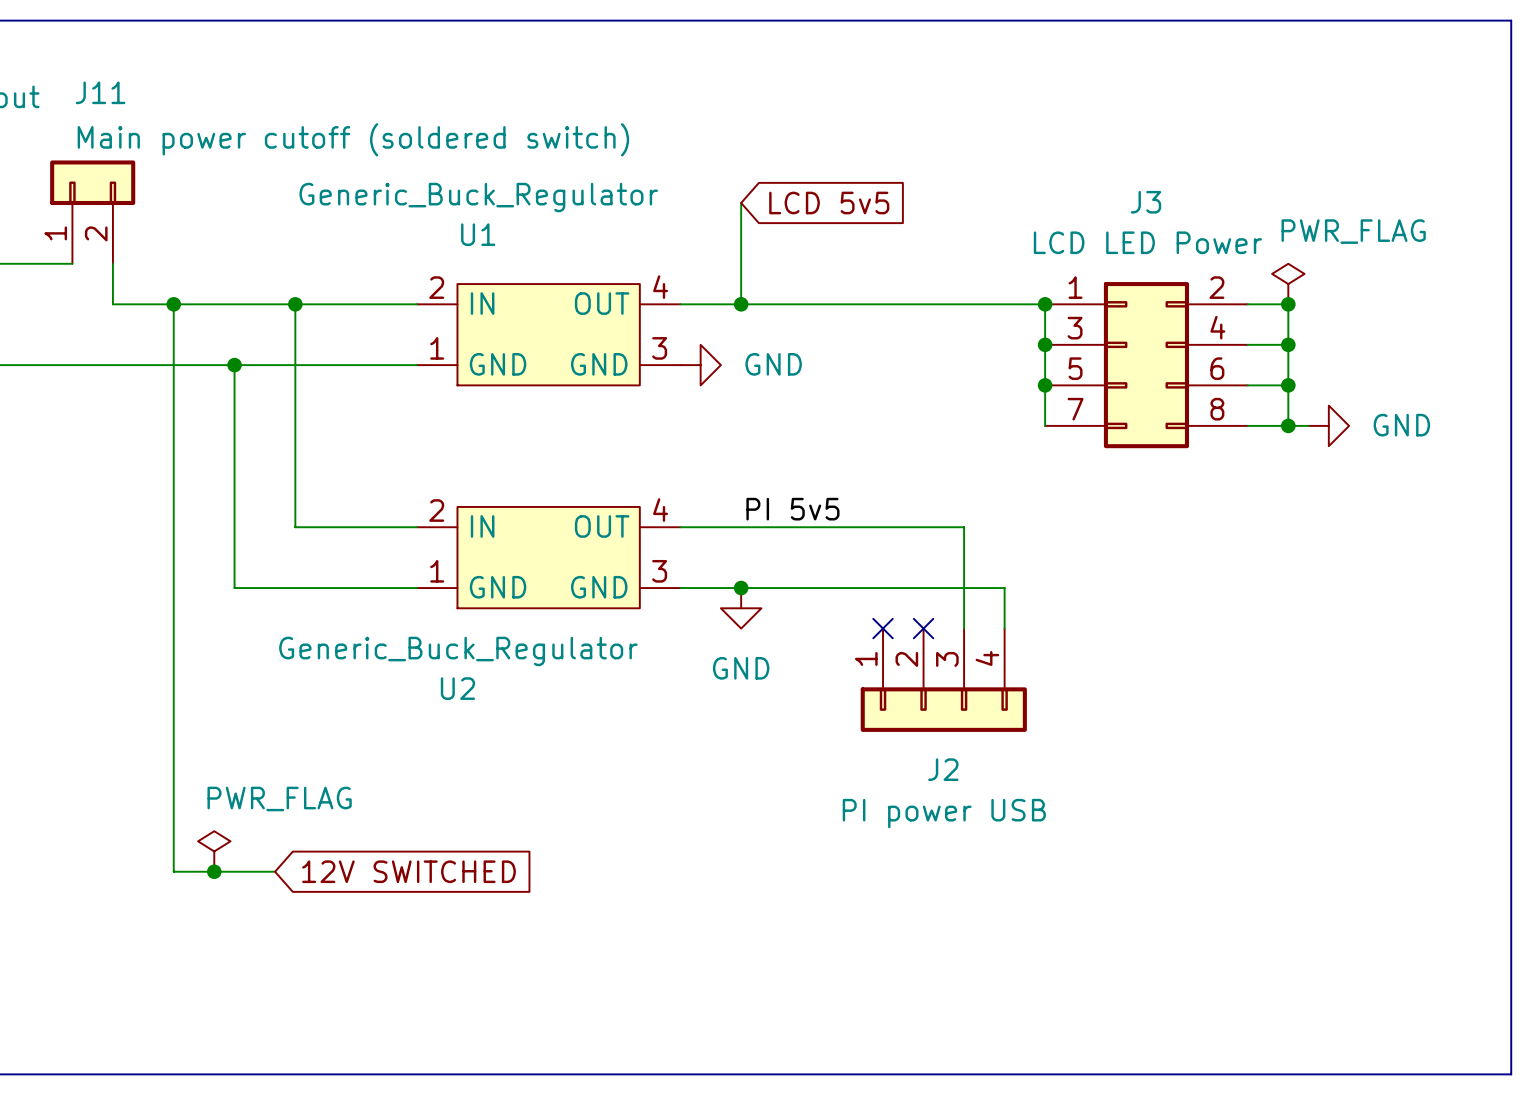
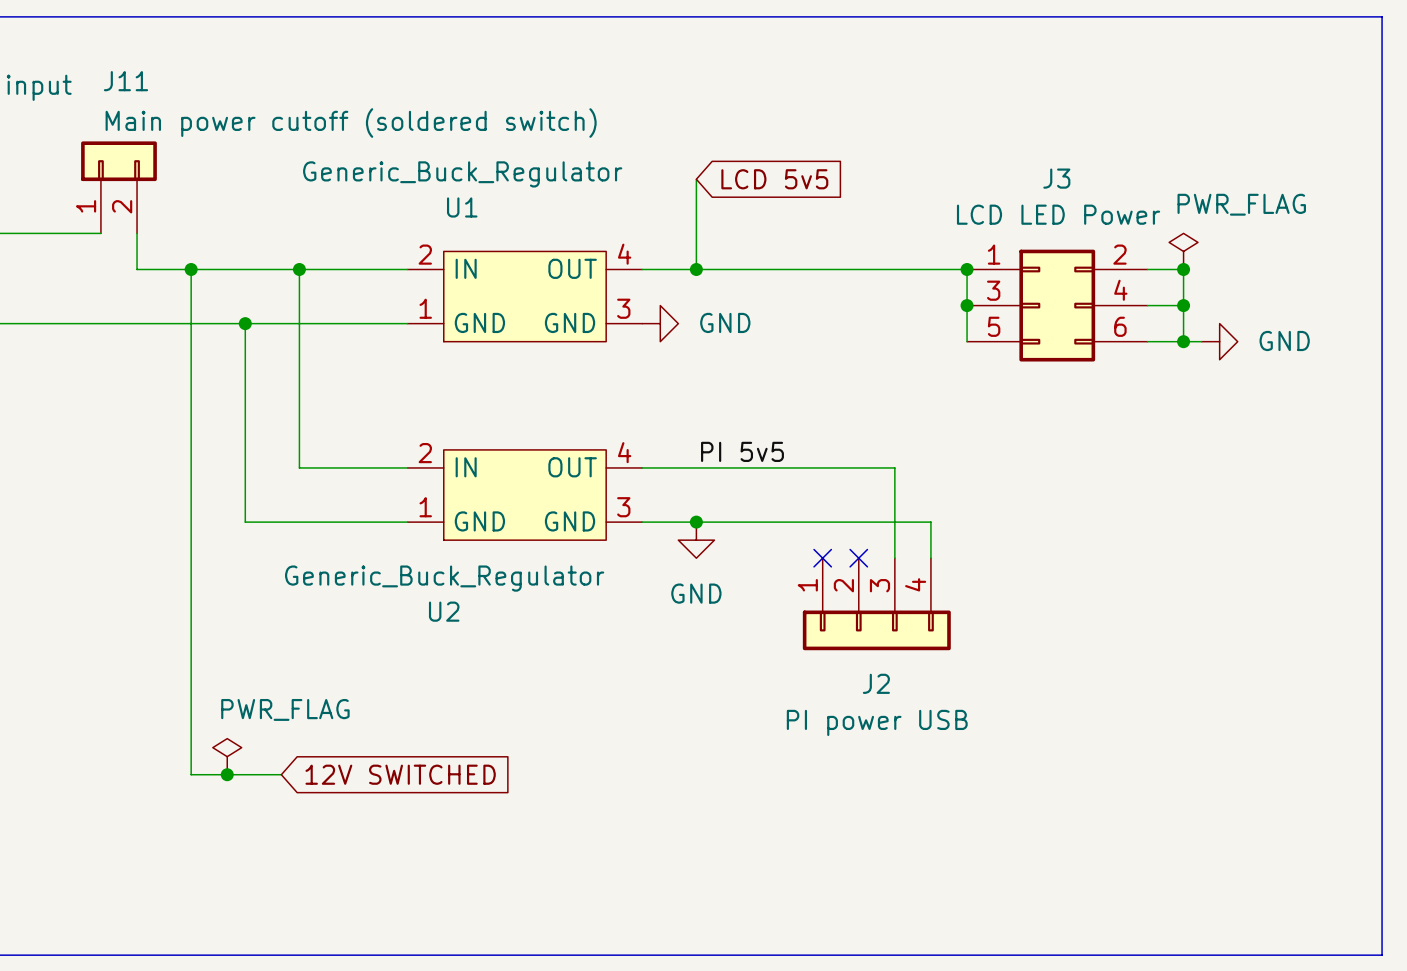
J3 symbol: [1045, 282, 1248, 449] -> [967, 249, 1148, 362]
wire: (1045, 385) (1045, 425) -> none
junction: (1045, 385) -> none
wire: (1288, 385) (1288, 425) -> (1183, 341) (1201, 341)
wire: (1247, 425) (1308, 425) -> none
junction: (1288, 425) -> none
power symbol position: GND (1328, 425) -> GND (1219, 341)

